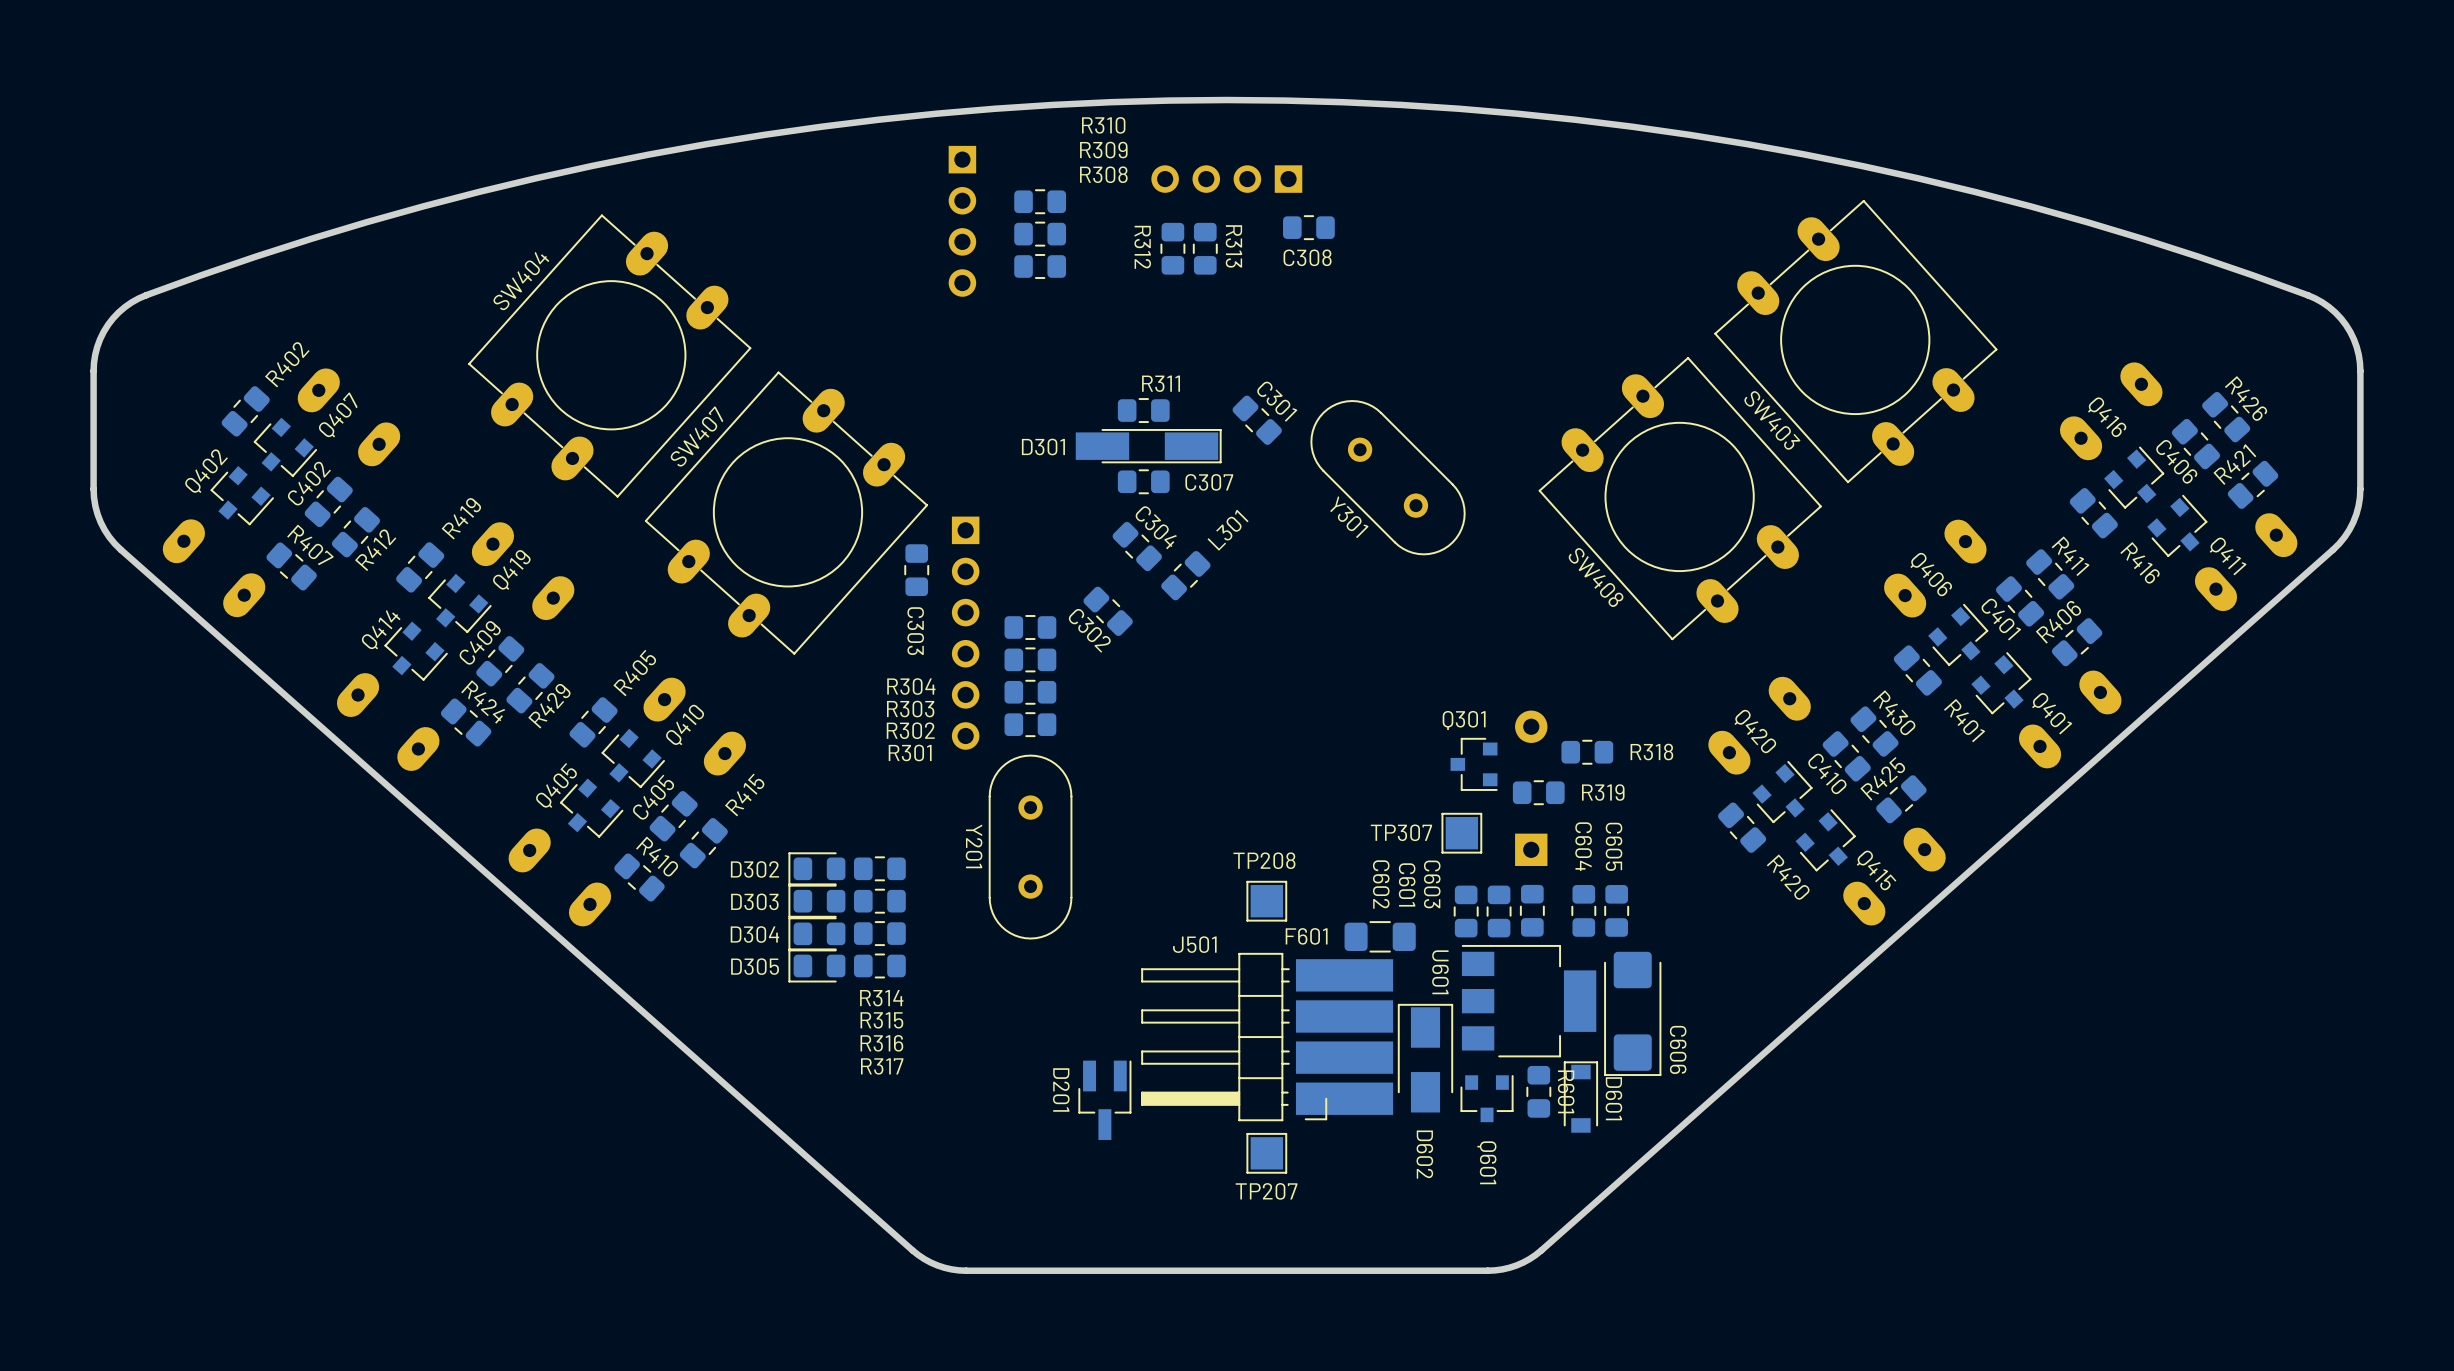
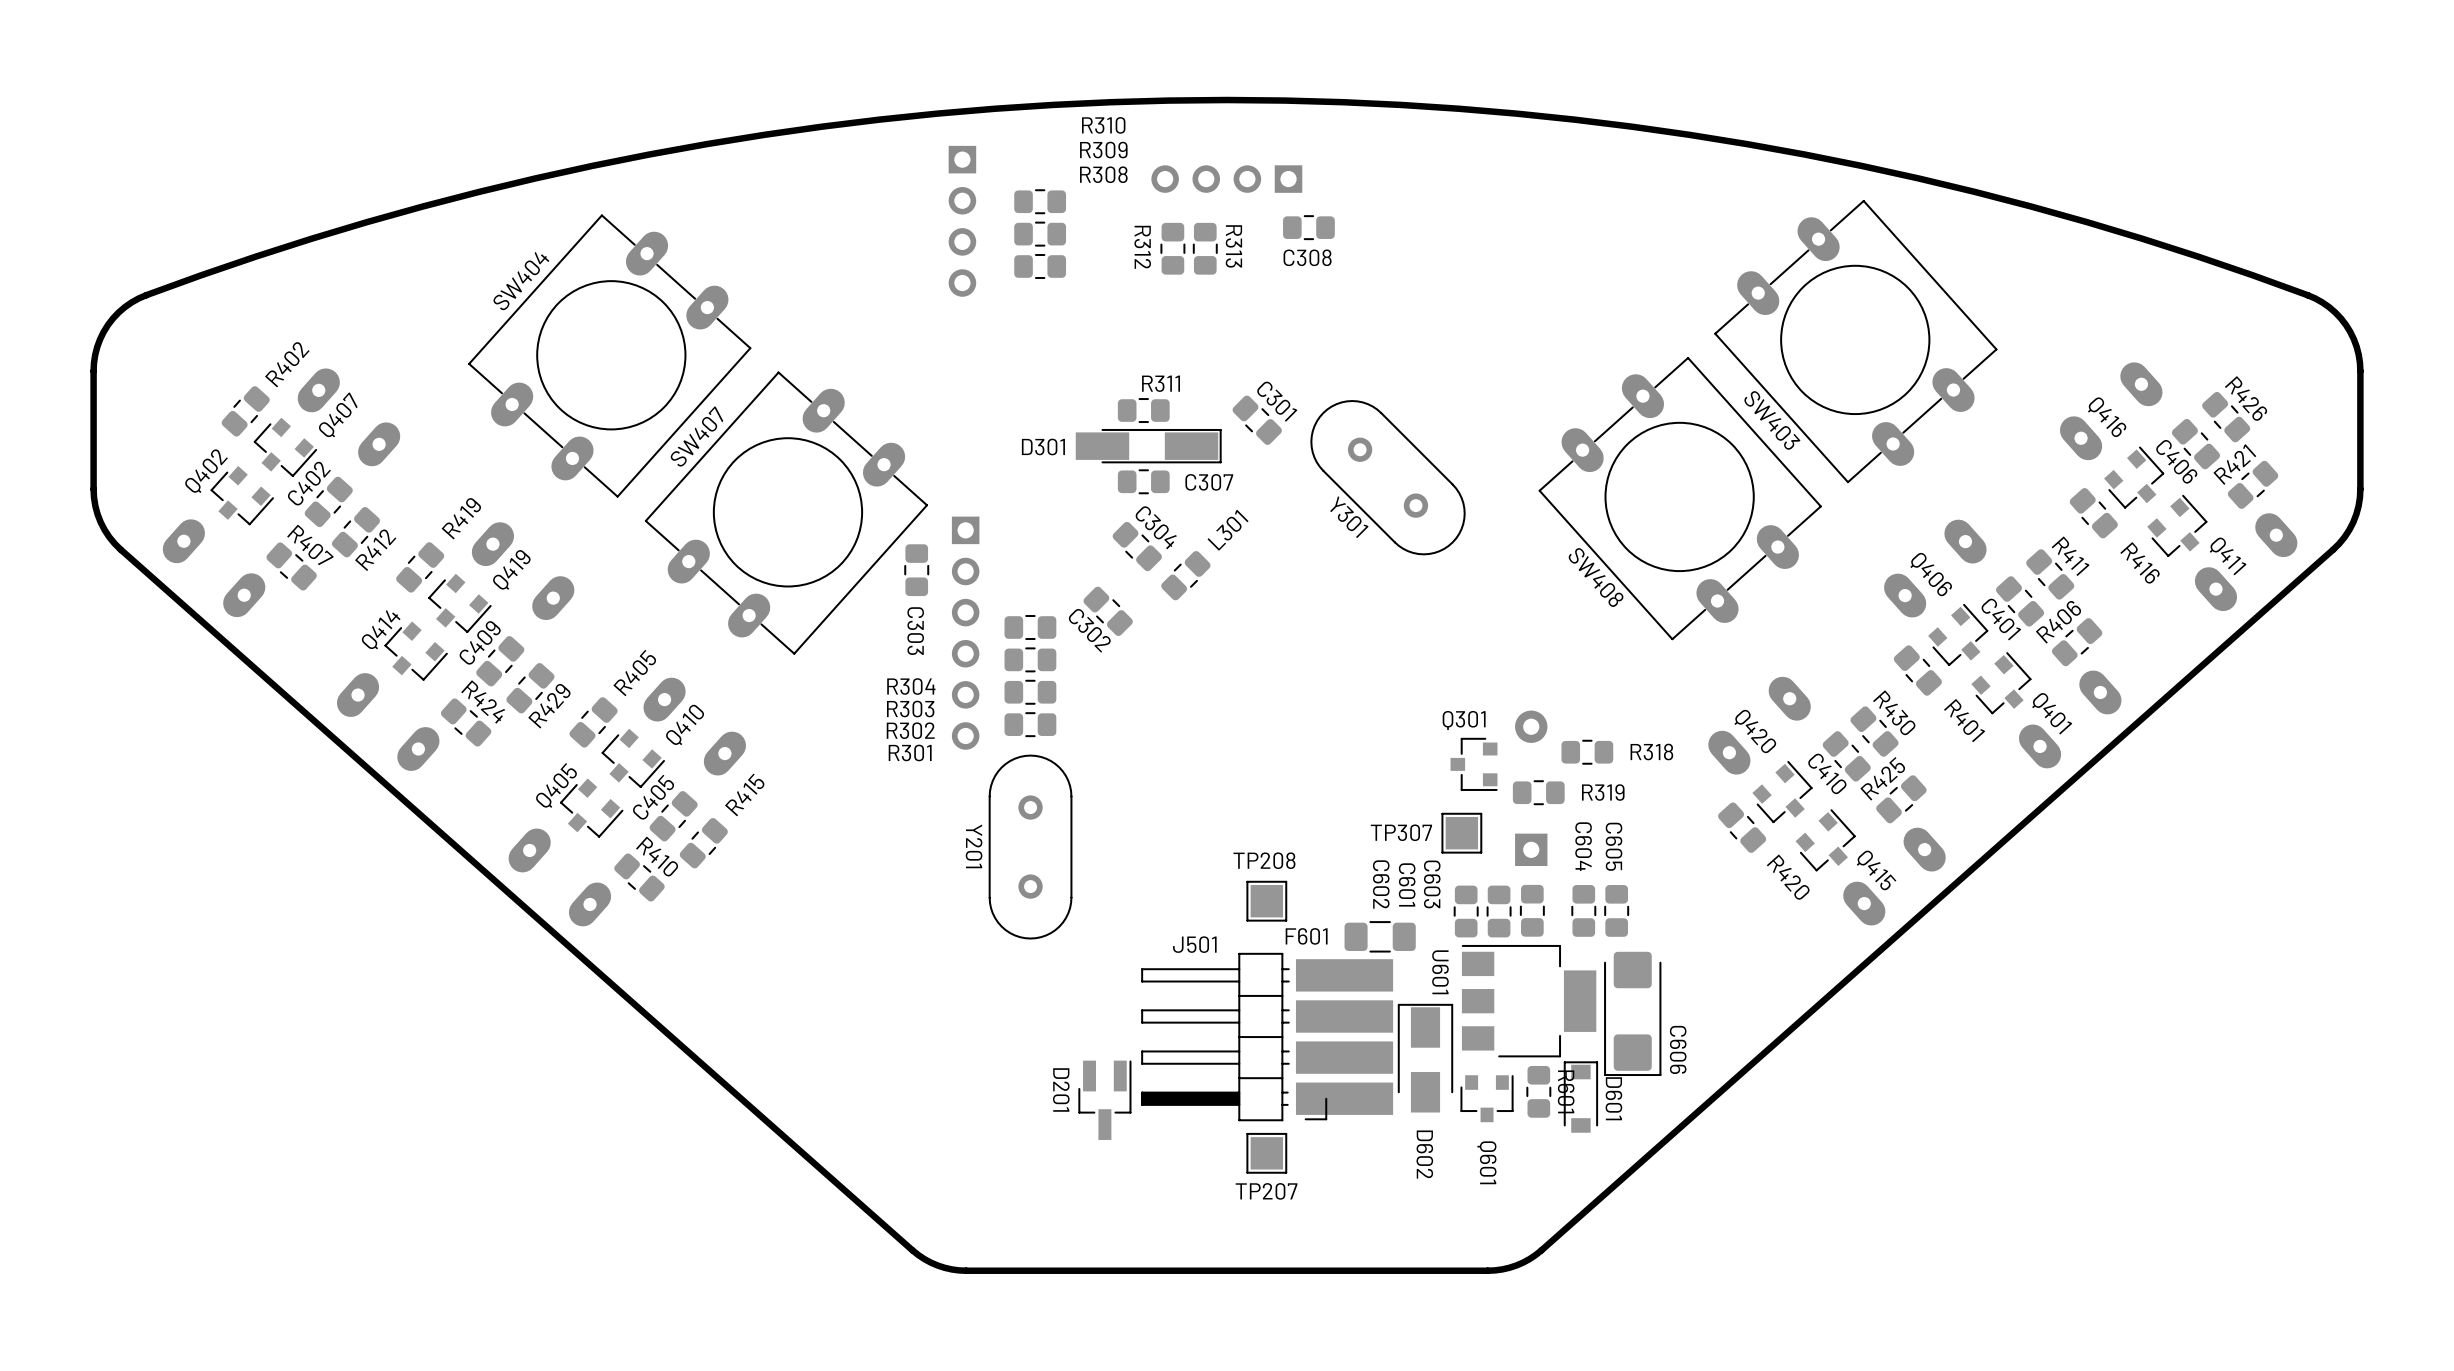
D302: (816, 868) -> none
R314: (879, 868) -> none
D303: (816, 901) -> none
R315: (879, 901) -> none
D304: (816, 933) -> none
R316: (879, 933) -> none
D305: (816, 965) -> none
R317: (879, 965) -> none

